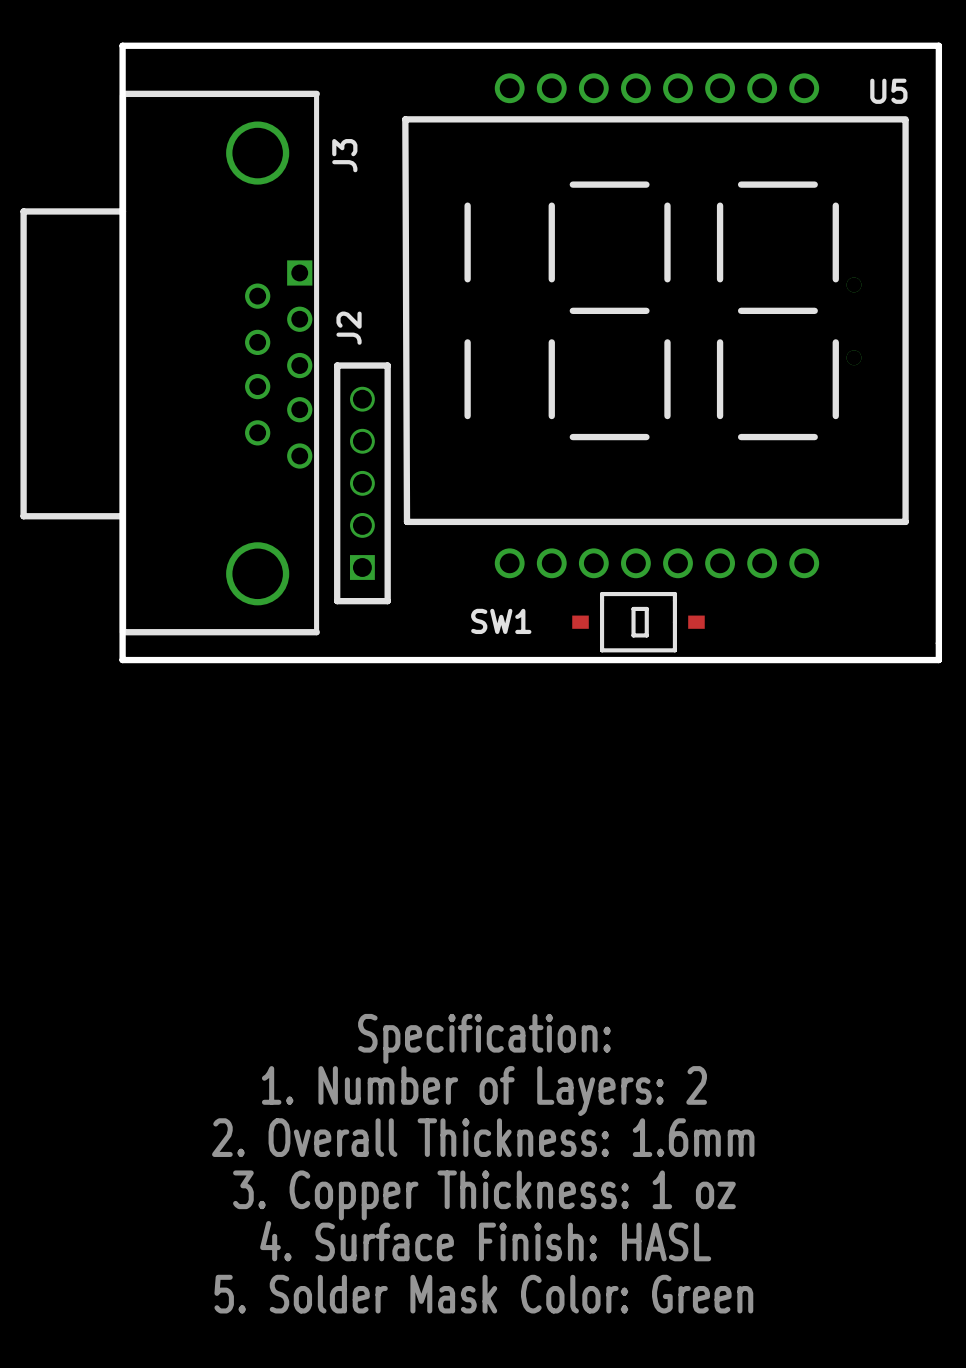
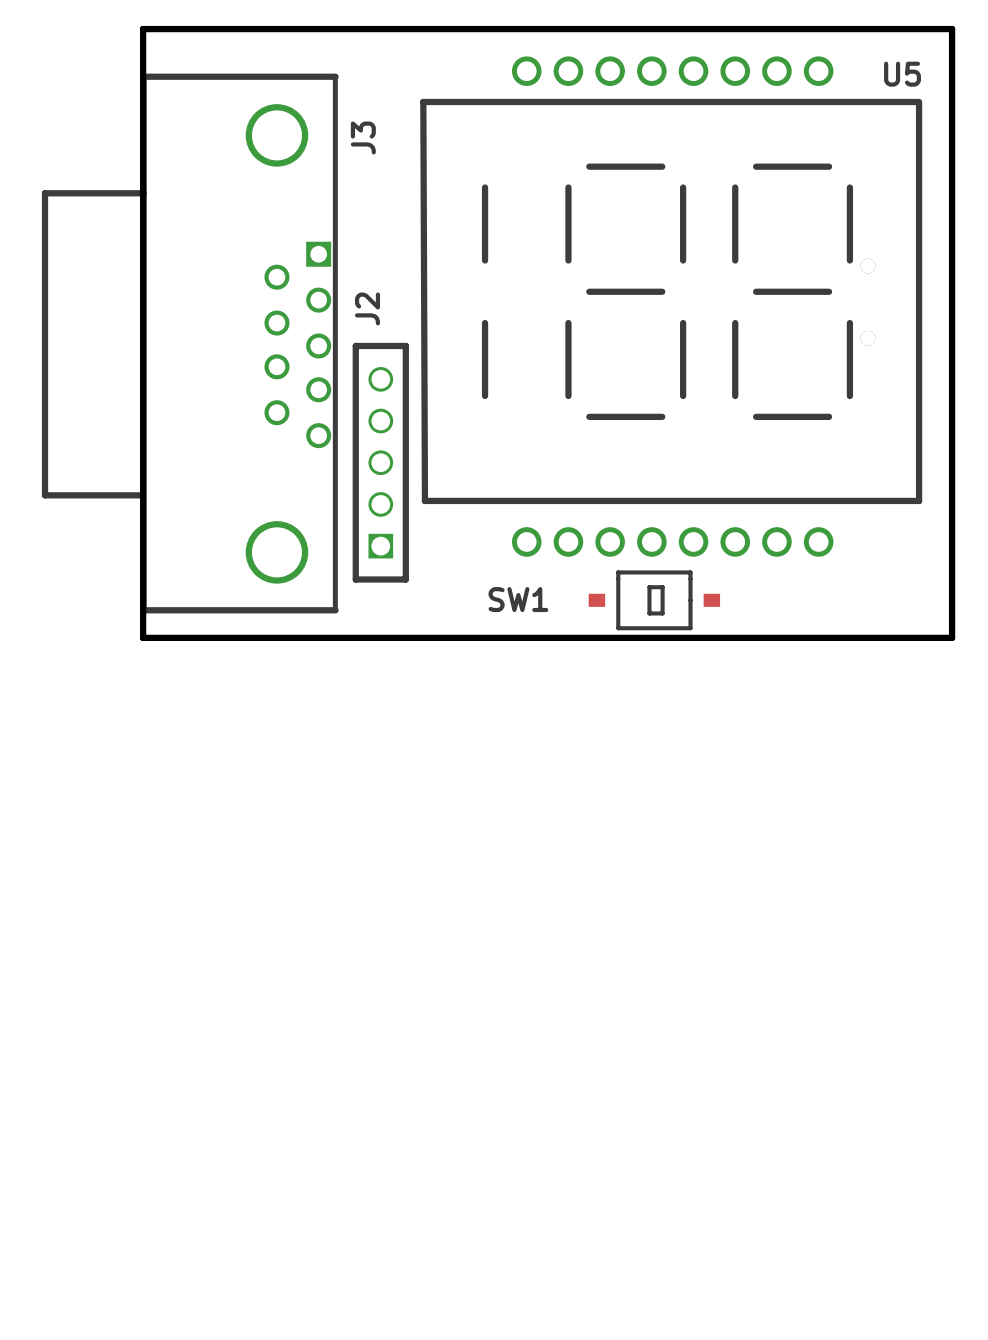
text: Specification: (484, 1038) -> none
text: 1. Number of Layers: 2 (484, 1091) -> none
text: 2. Overall Thickness: 1.6mm (483, 1137) -> none
text: 3. Copper Thickness: 1 oz (484, 1195) -> none
text: 4. Surface Finish: HASL (485, 1241) -> none
text: 5. Solder Mask Color: Green (483, 1294) -> none

